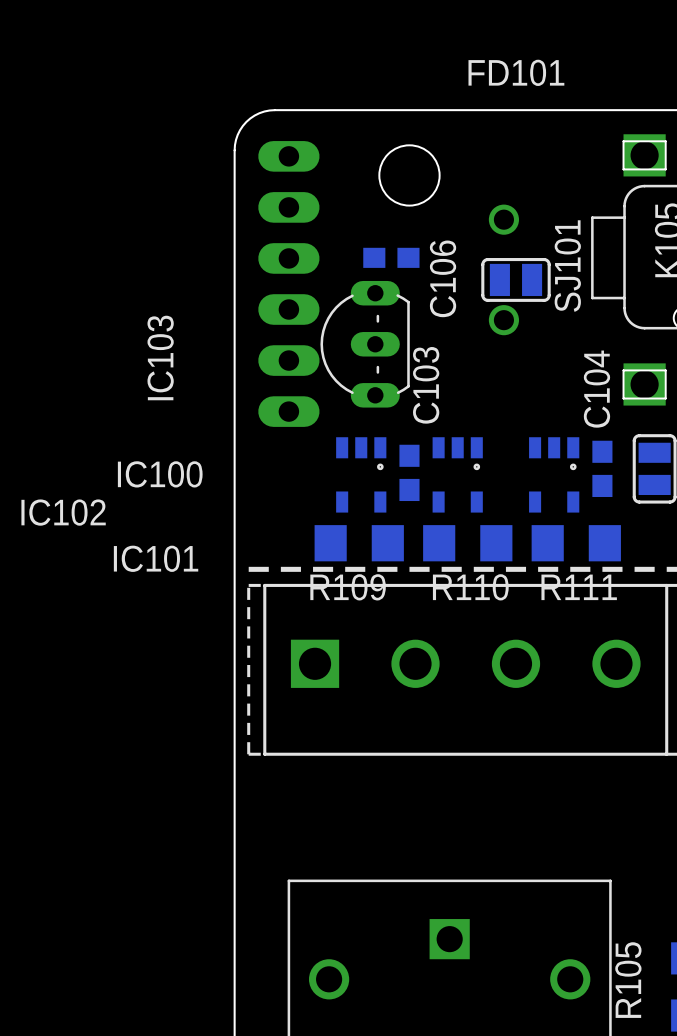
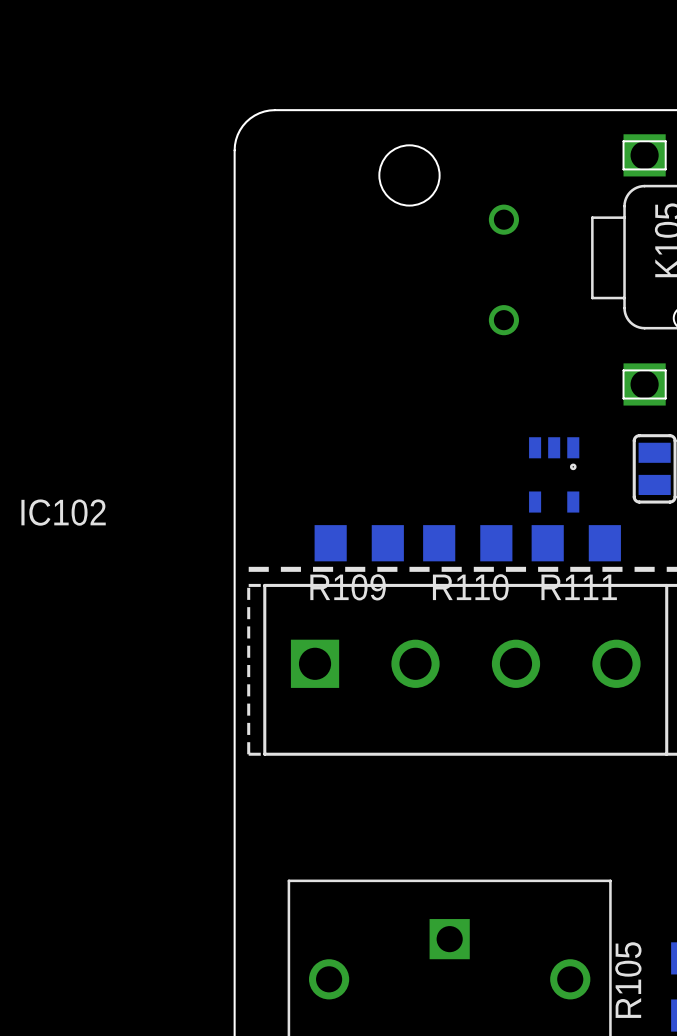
FD101: (516, 72) -> none
C106: (391, 257) -> none
SJ101: (515, 279) -> none
part: (288, 283) -> none
IC103: (365, 344) -> none
C104: (602, 468) -> none
C103: (409, 472) -> none
IC100: (361, 474) -> none
IC101: (457, 474) -> none

